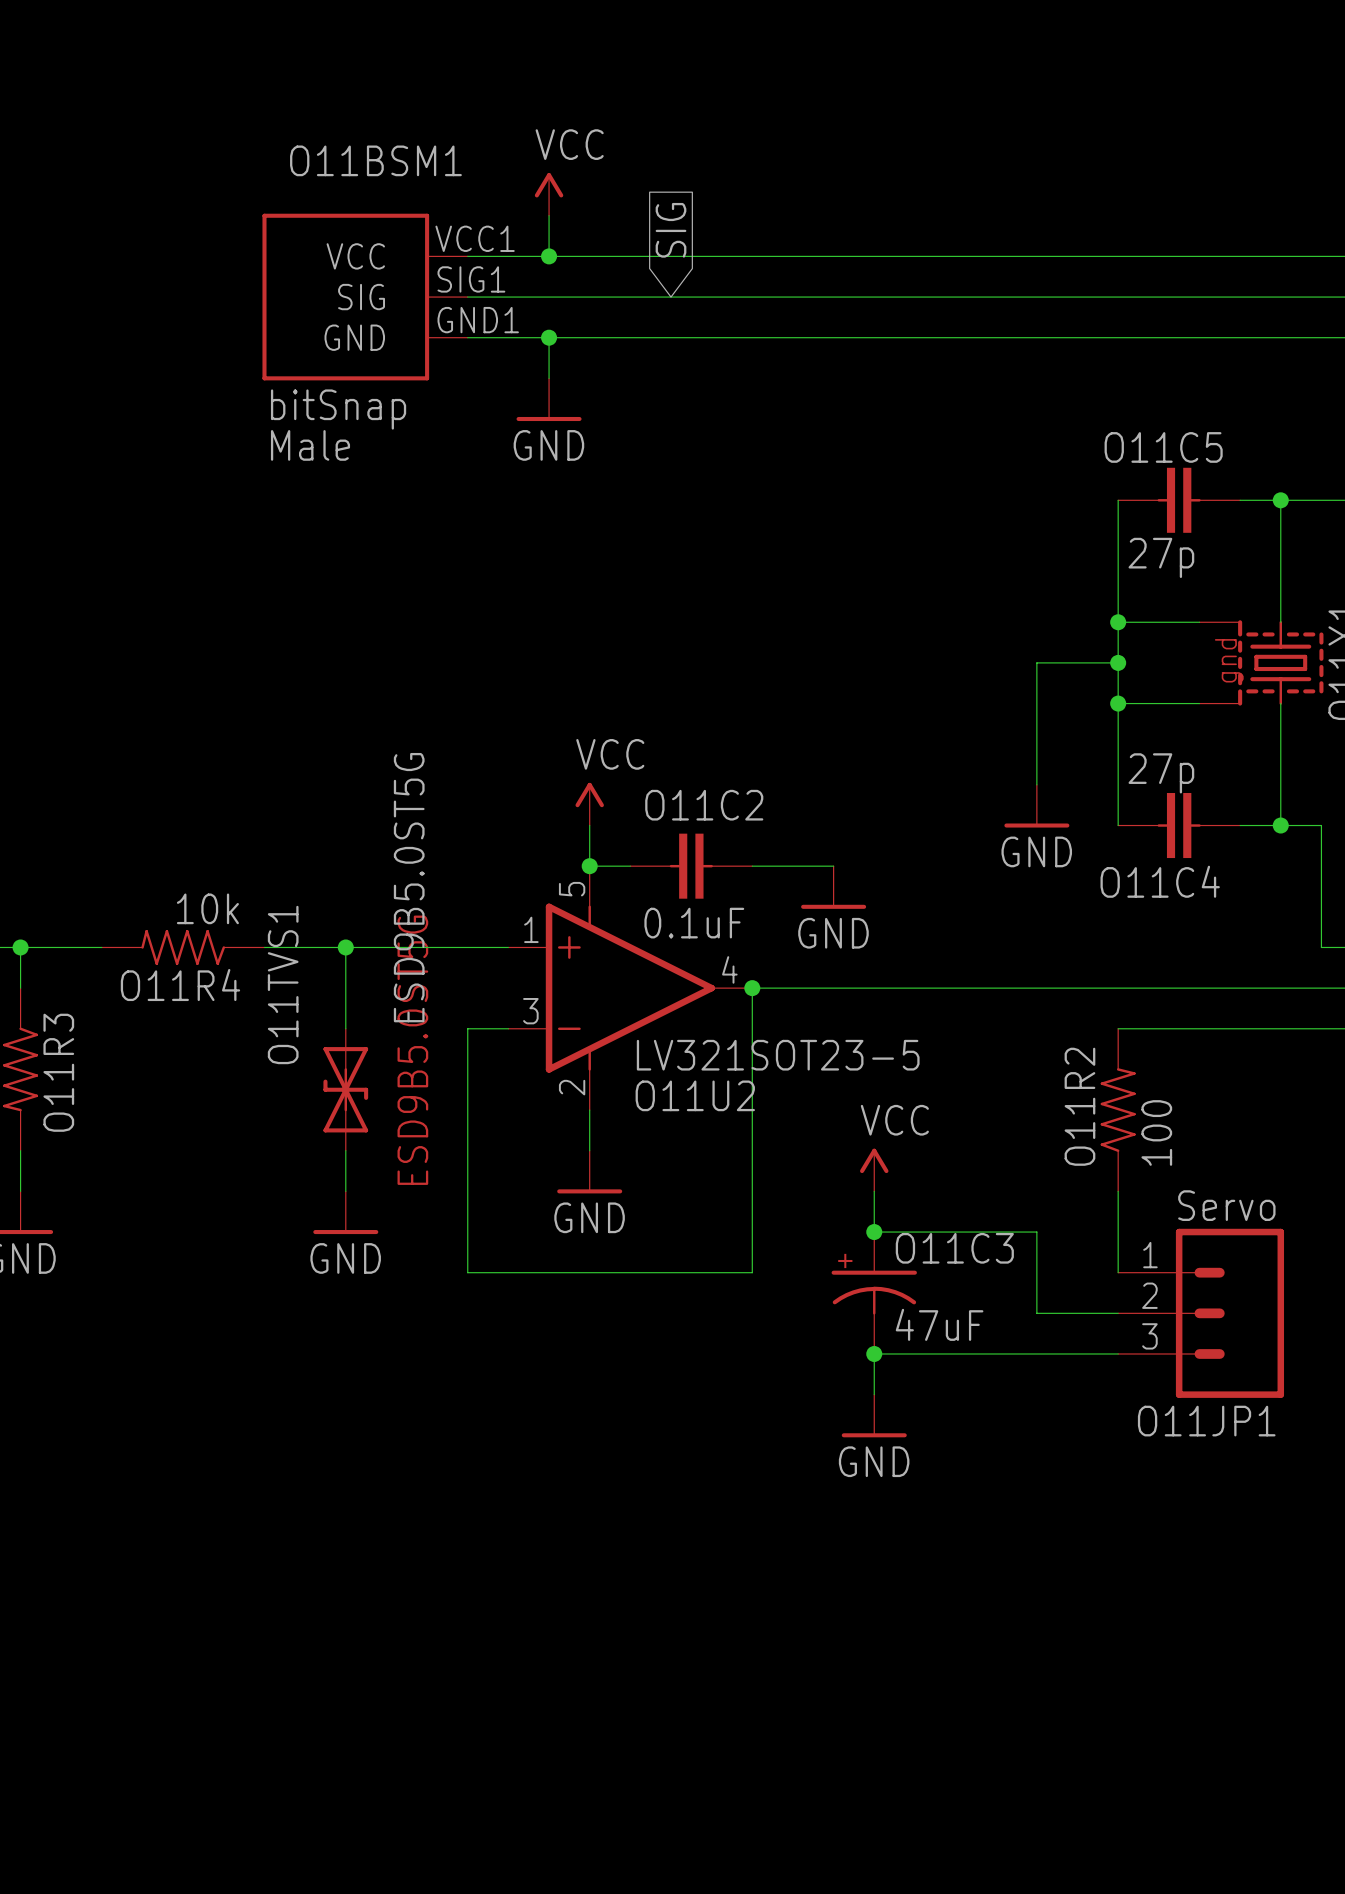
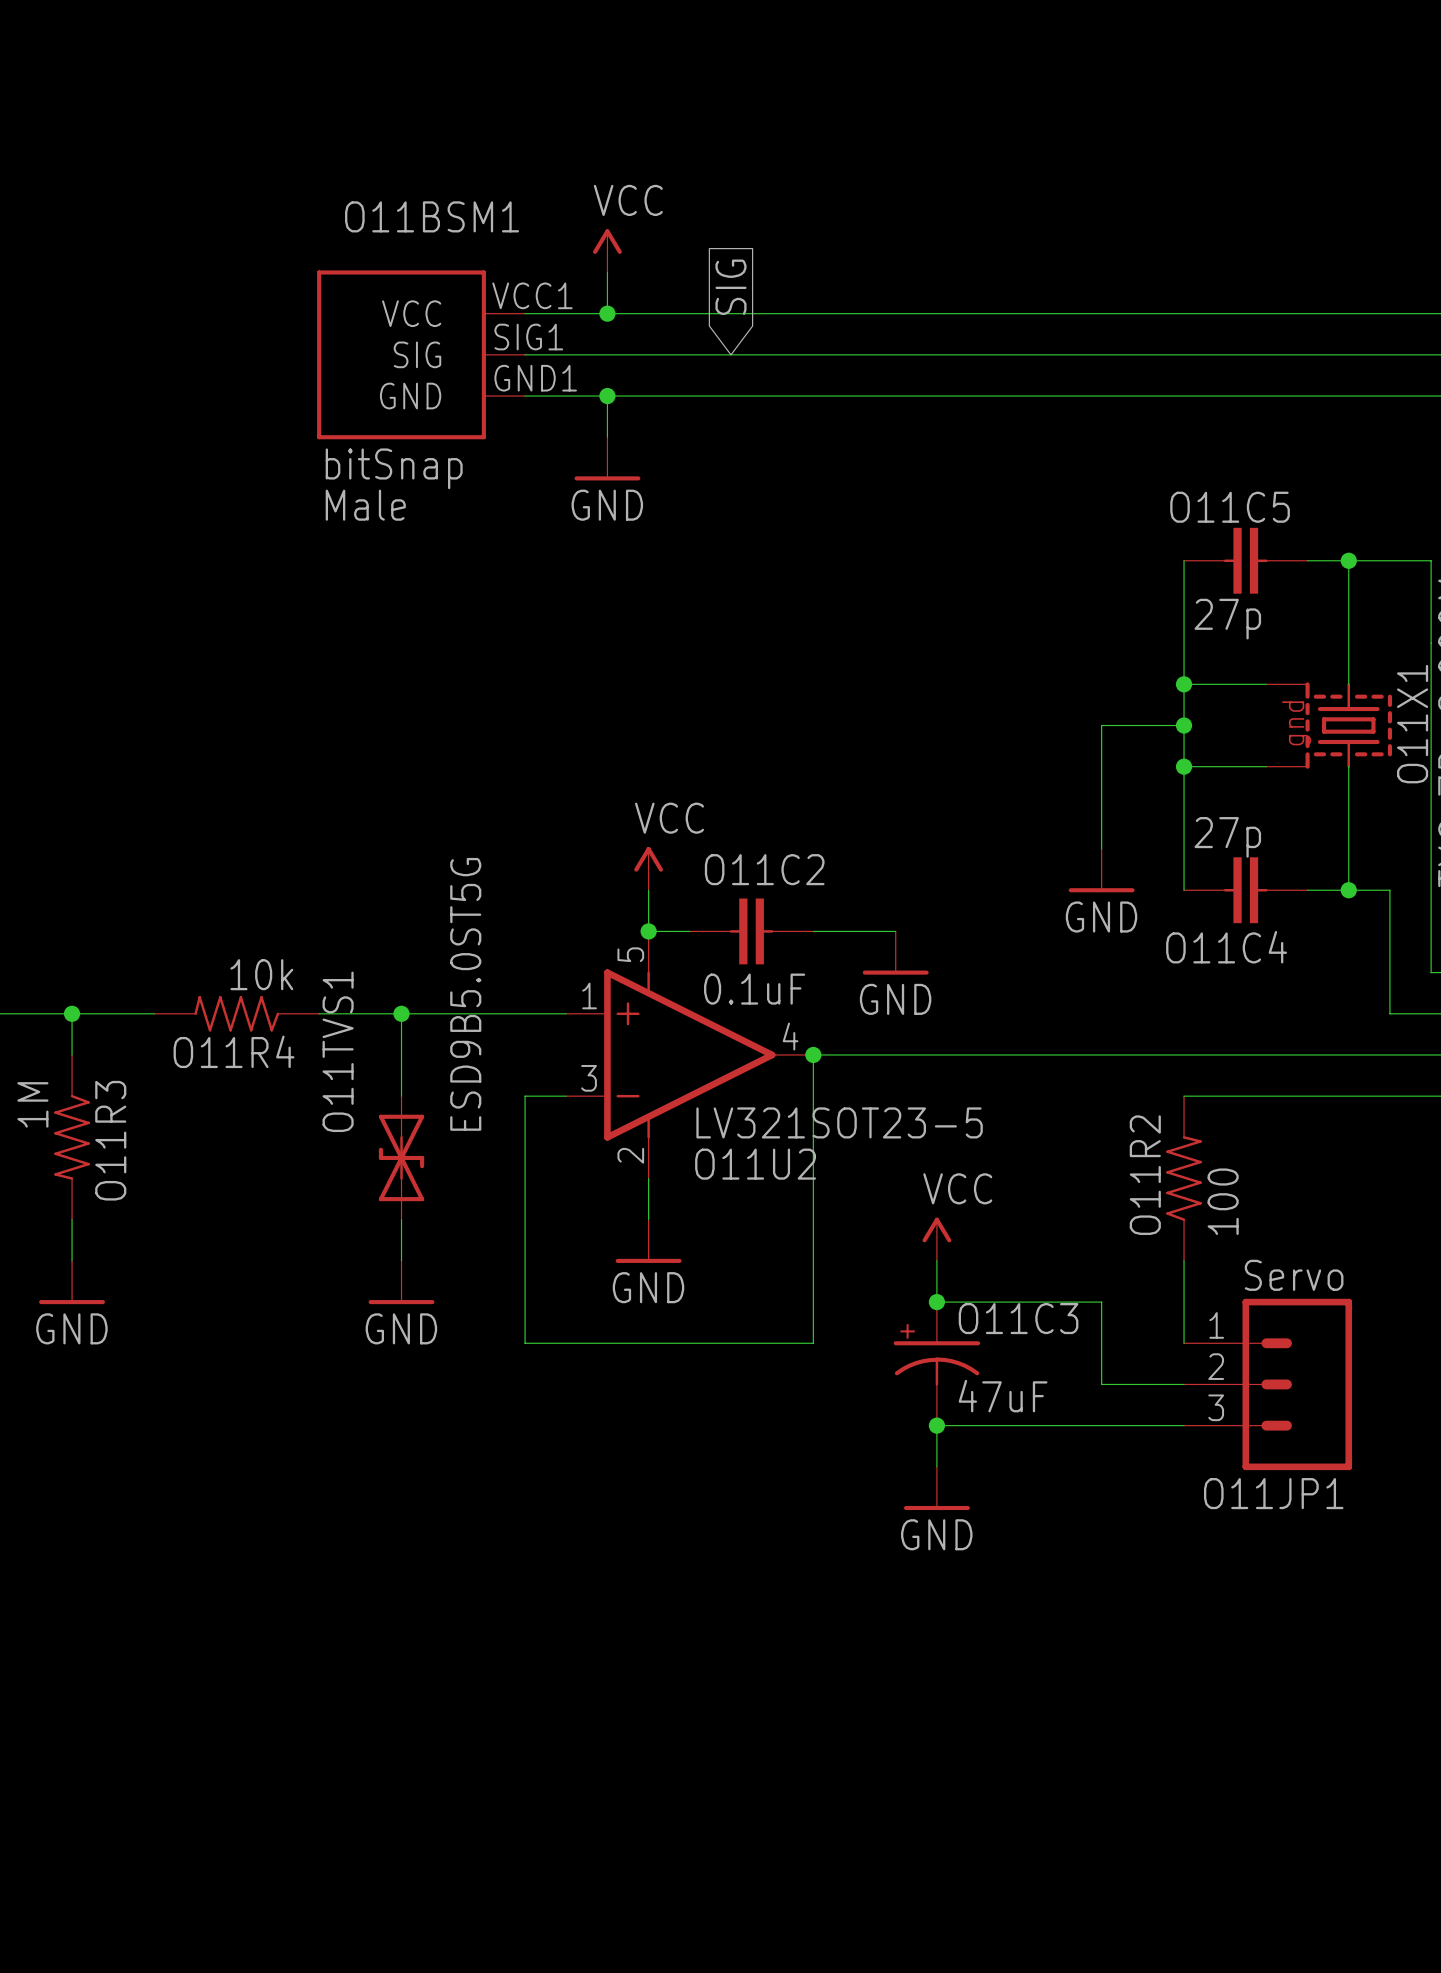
O11TVS1 value position: ESD9B5.0ST5G (409, 887) -> ESD9B5.0ST5G (465, 994)
O11TVS1 text: ESD9B5.0ST5G (412, 1050) -> none

